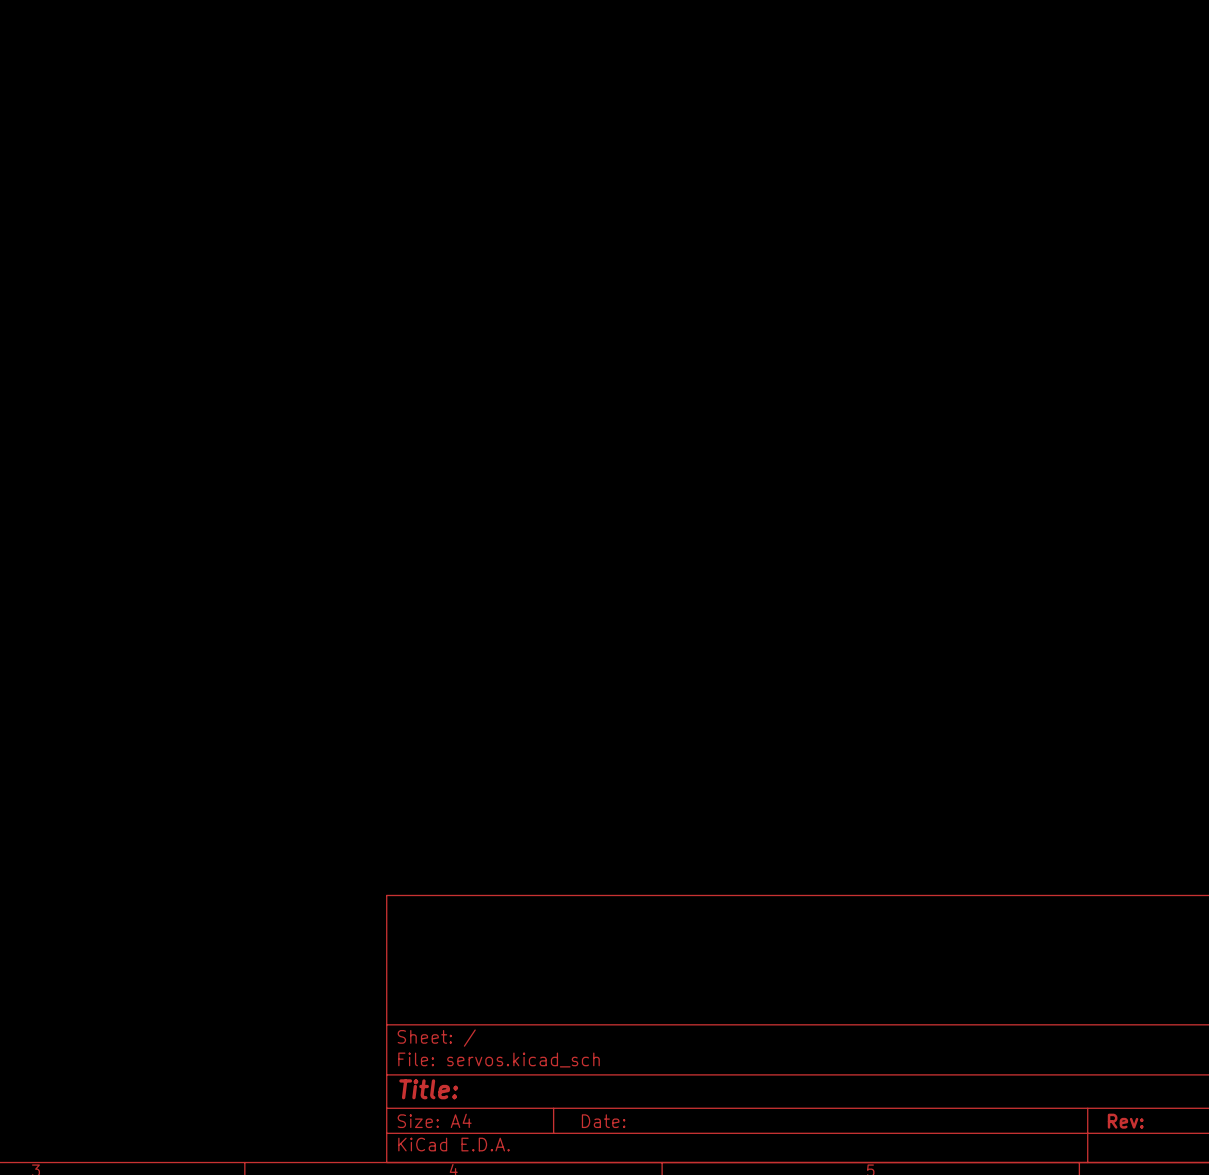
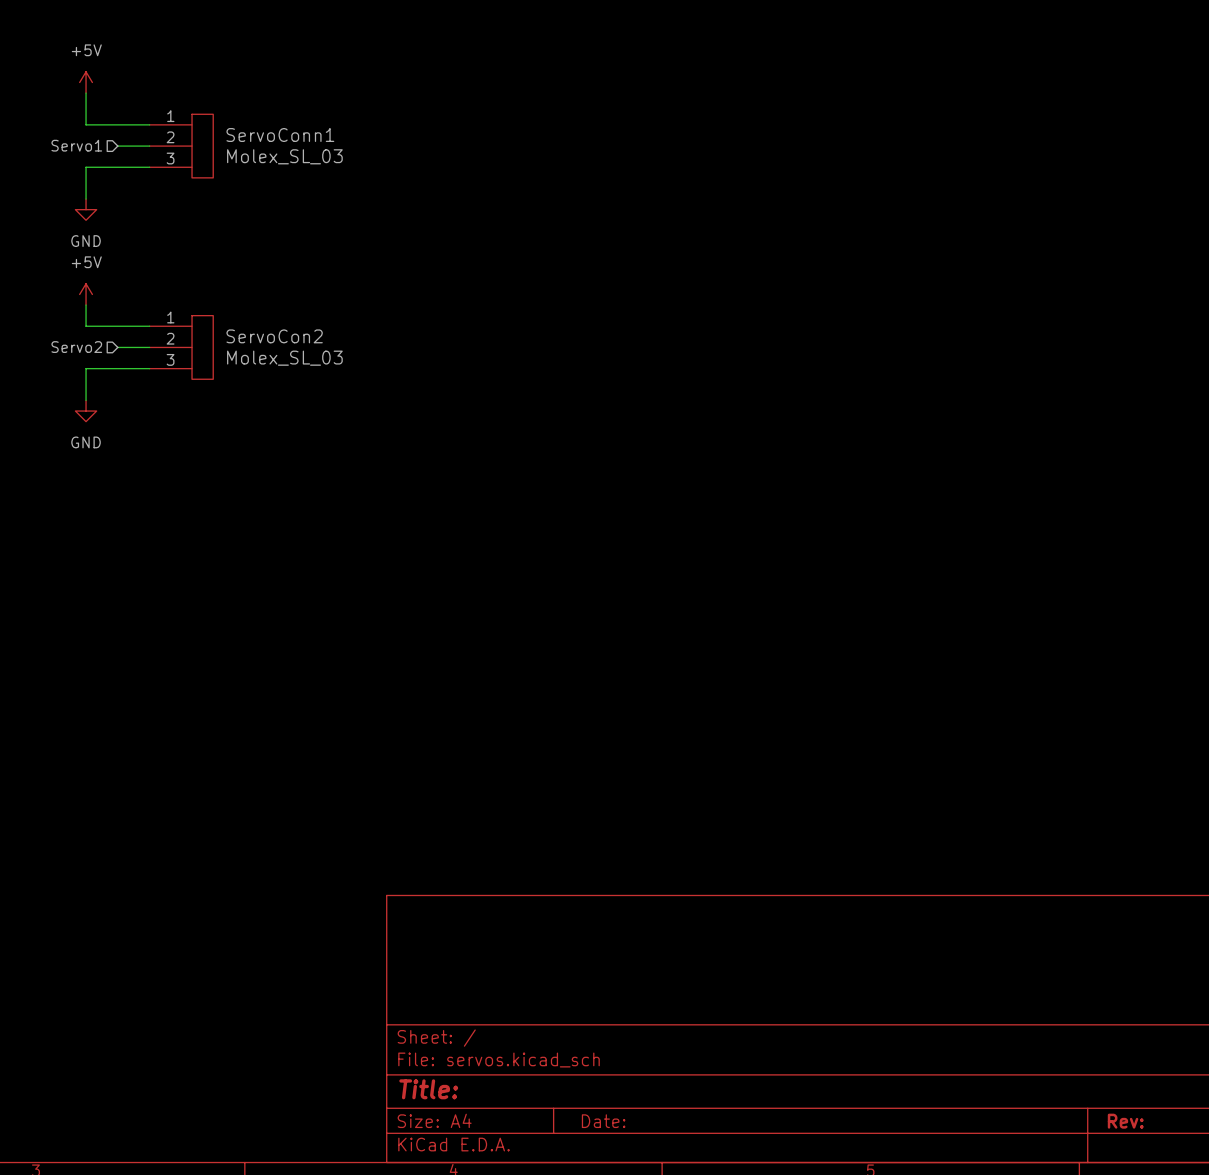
power symbol: none -> +5V (86, 82)
wire: none -> (86, 93) (86, 124) (149, 124)
hierarchical label: none -> Servo1 (76, 145)
wire: none -> (117, 146) (149, 146)
ServoConn1: none -> Molex_SL_03 (181, 146)
wire: none -> (149, 167) (86, 167) (86, 199)
power symbol: none -> GND (86, 209)
power symbol: none -> +5V (86, 294)
wire: none -> (86, 305) (86, 326) (149, 326)
hierarchical label: none -> Servo2 (76, 347)
wire: none -> (117, 347) (149, 347)
ServoCon2: none -> Molex_SL_03 (181, 347)
wire: none -> (149, 368) (86, 368) (86, 400)
power symbol: none -> GND (86, 411)

